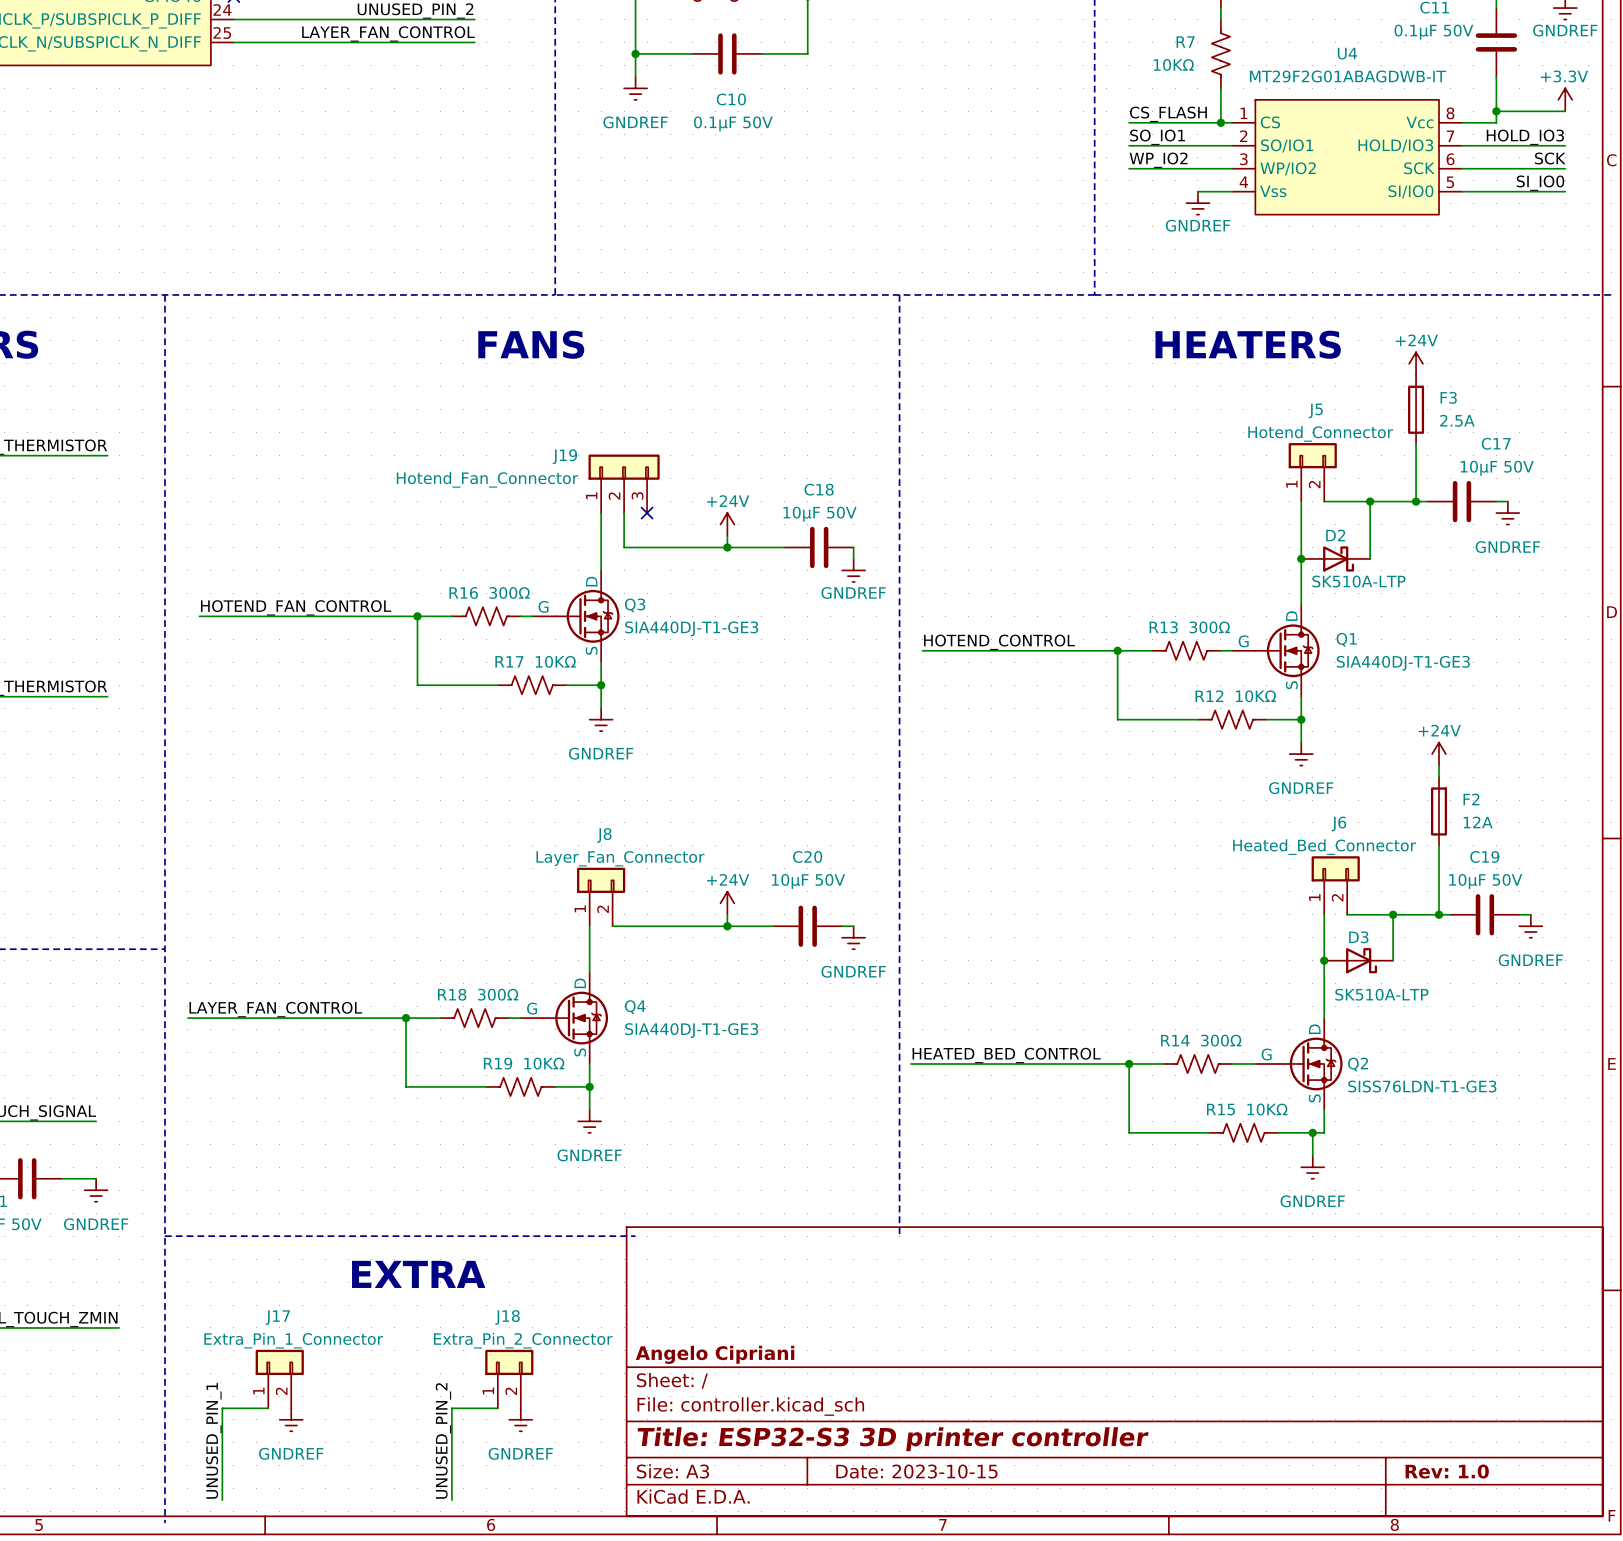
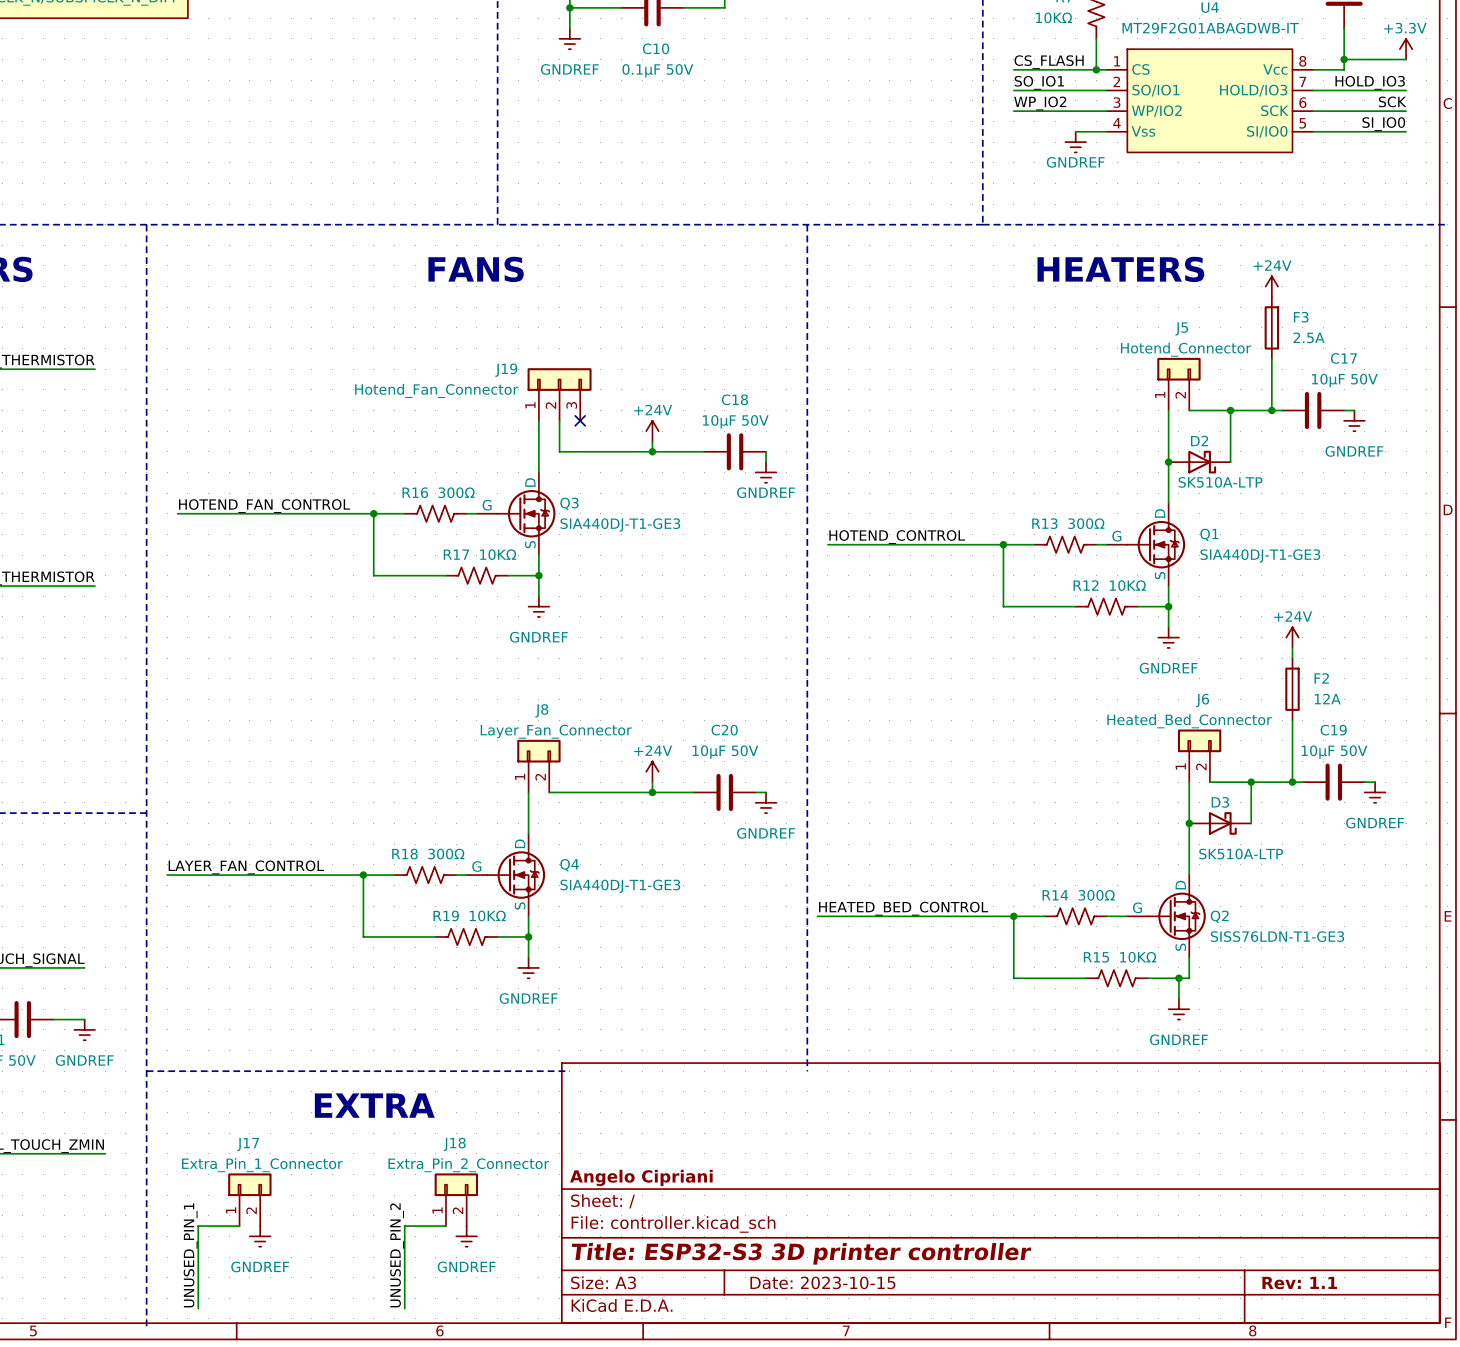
title block: Rev: 1.0 (1447, 1471) -> Rev: 1.1 (1299, 1283)

